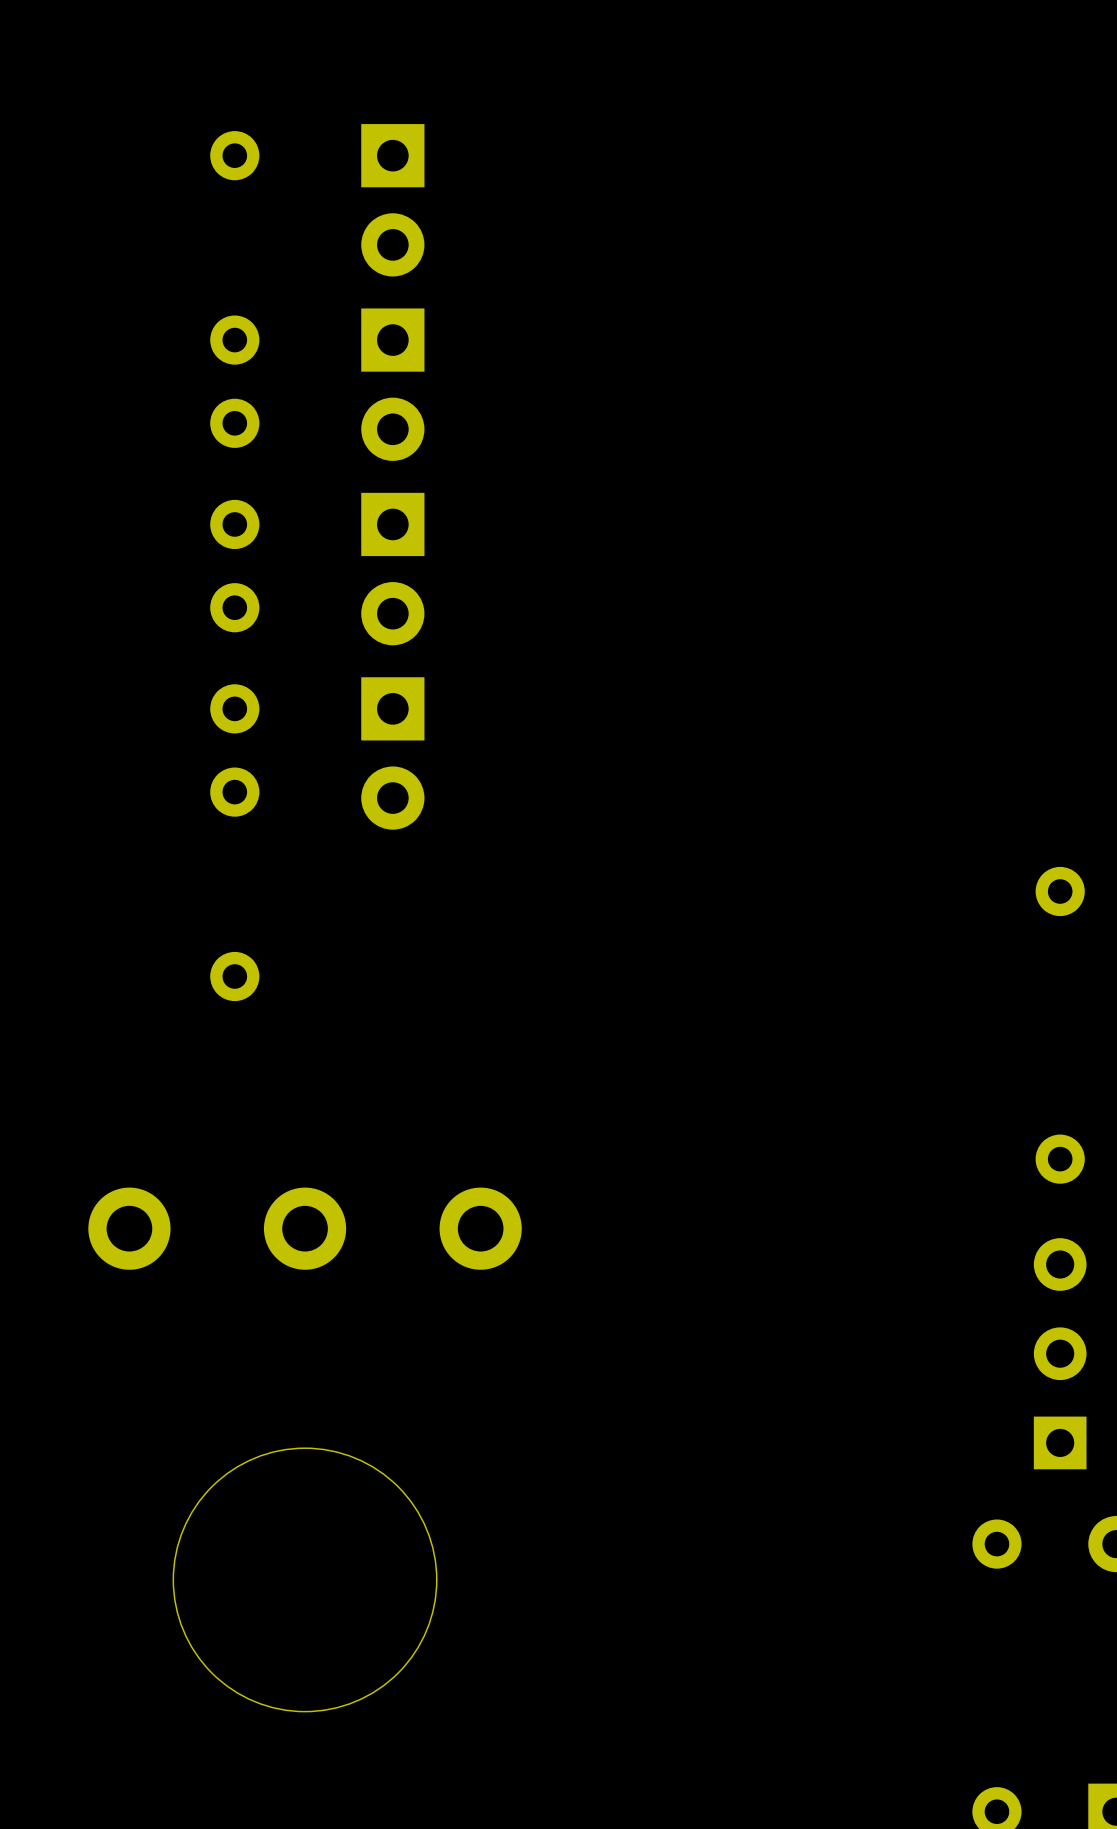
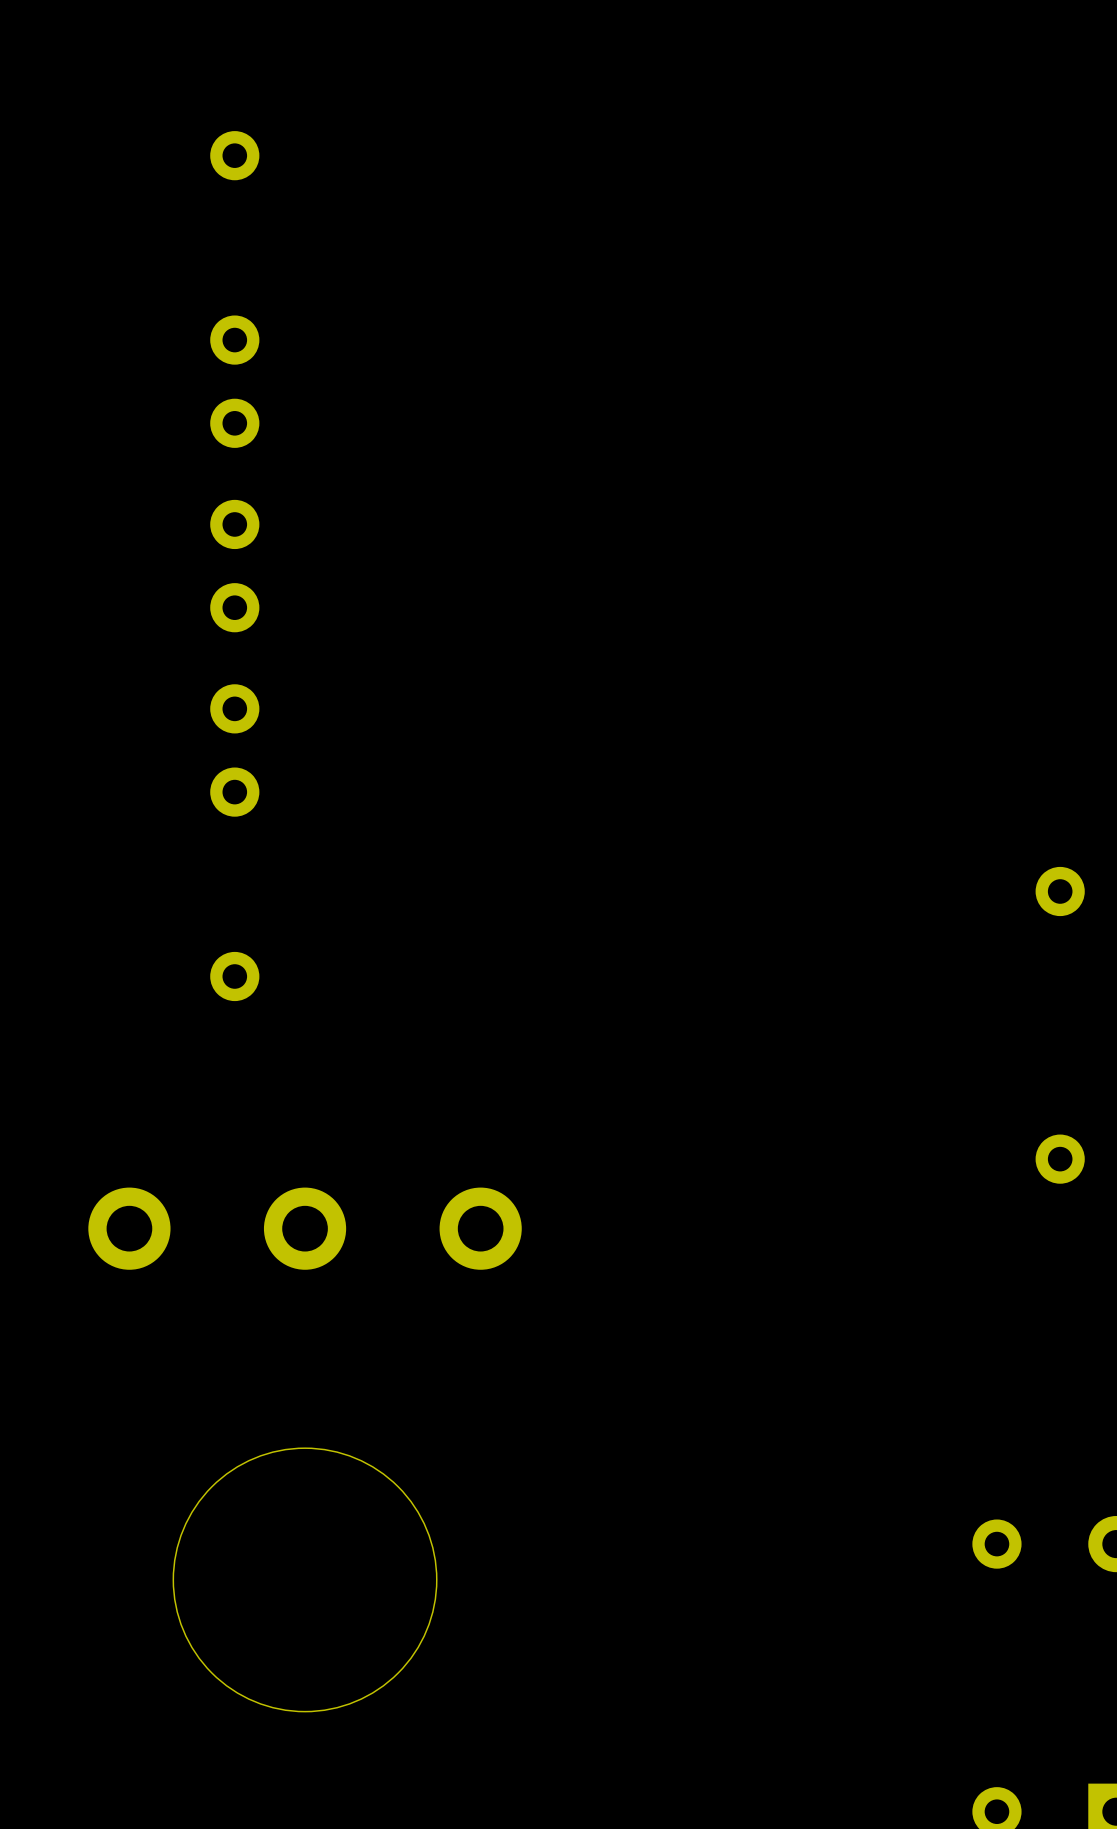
part: (392, 200) -> none
part: (392, 384) -> none
part: (392, 569) -> none
part: (392, 753) -> none
part: (1060, 1353) -> none

